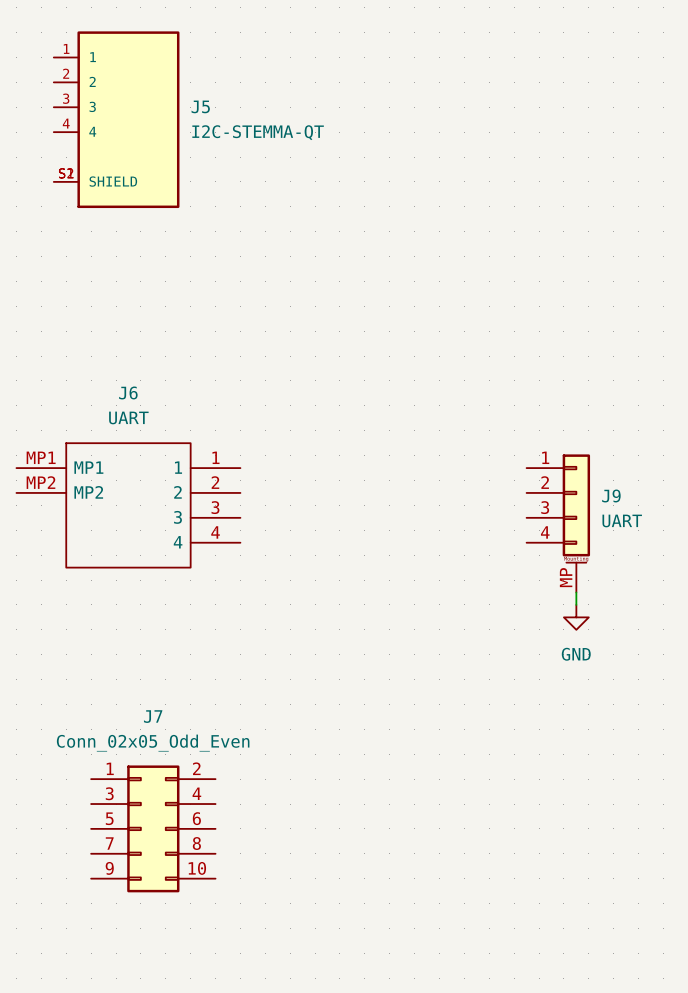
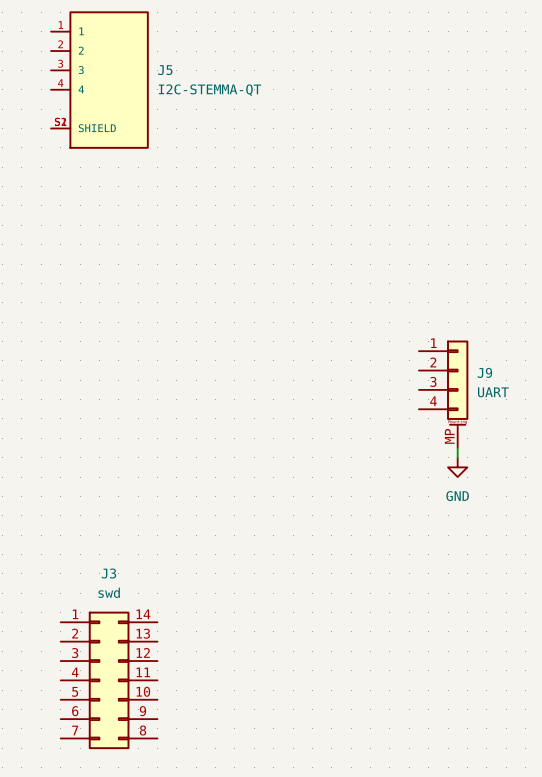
J6: UART (128, 505) -> none
J7: Conn_02x05_Odd_Even (153, 828) -> none
J3: none -> swd (109, 680)

